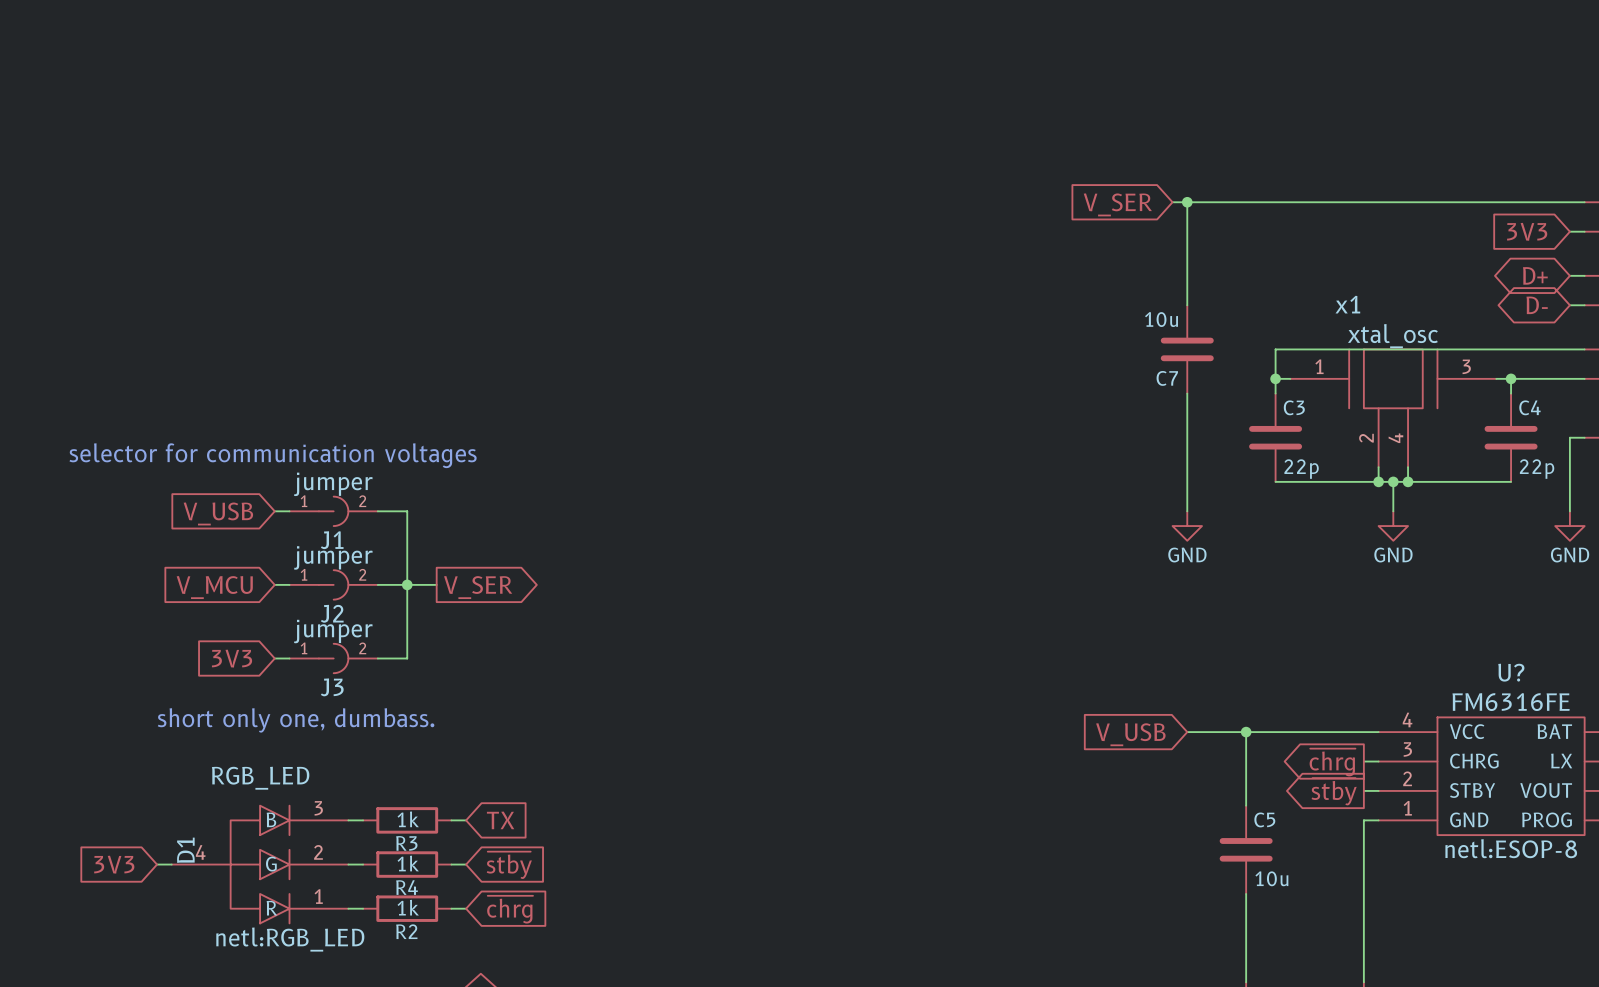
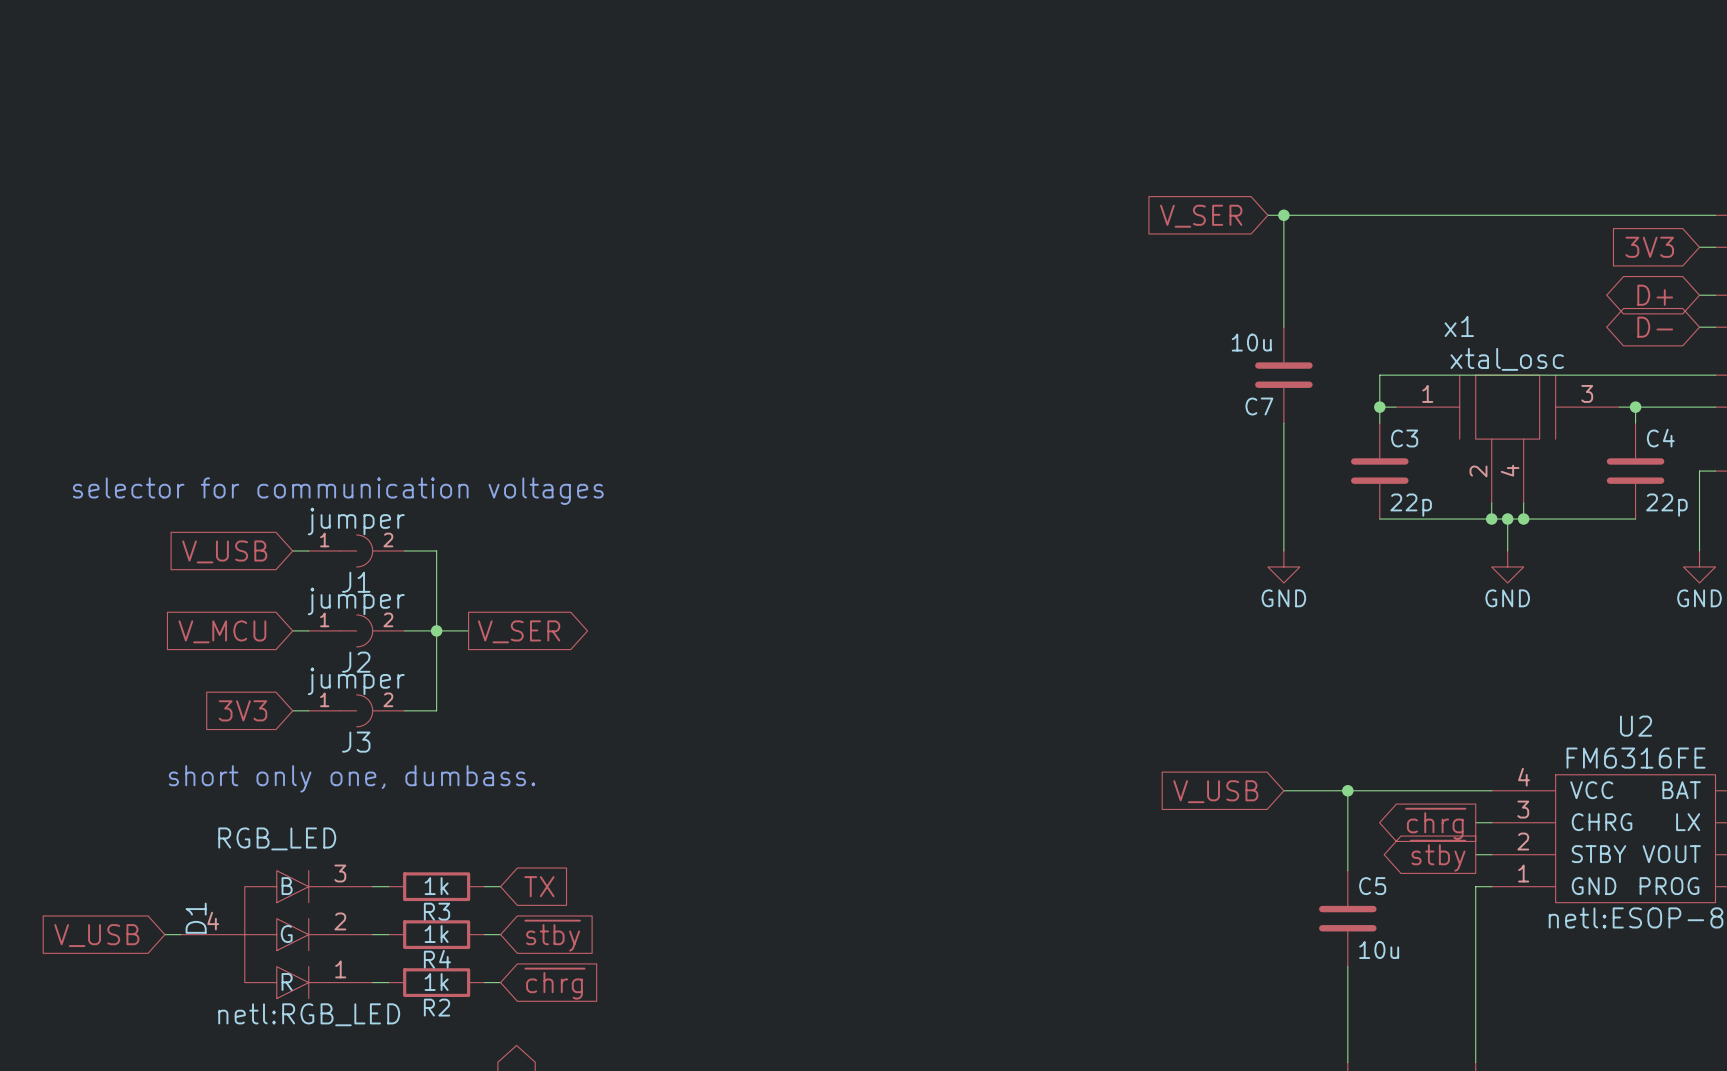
U? name: U? (1511, 672) -> U2 (1636, 726)
global label: 3V3 (114, 864) -> V_USB (96, 935)

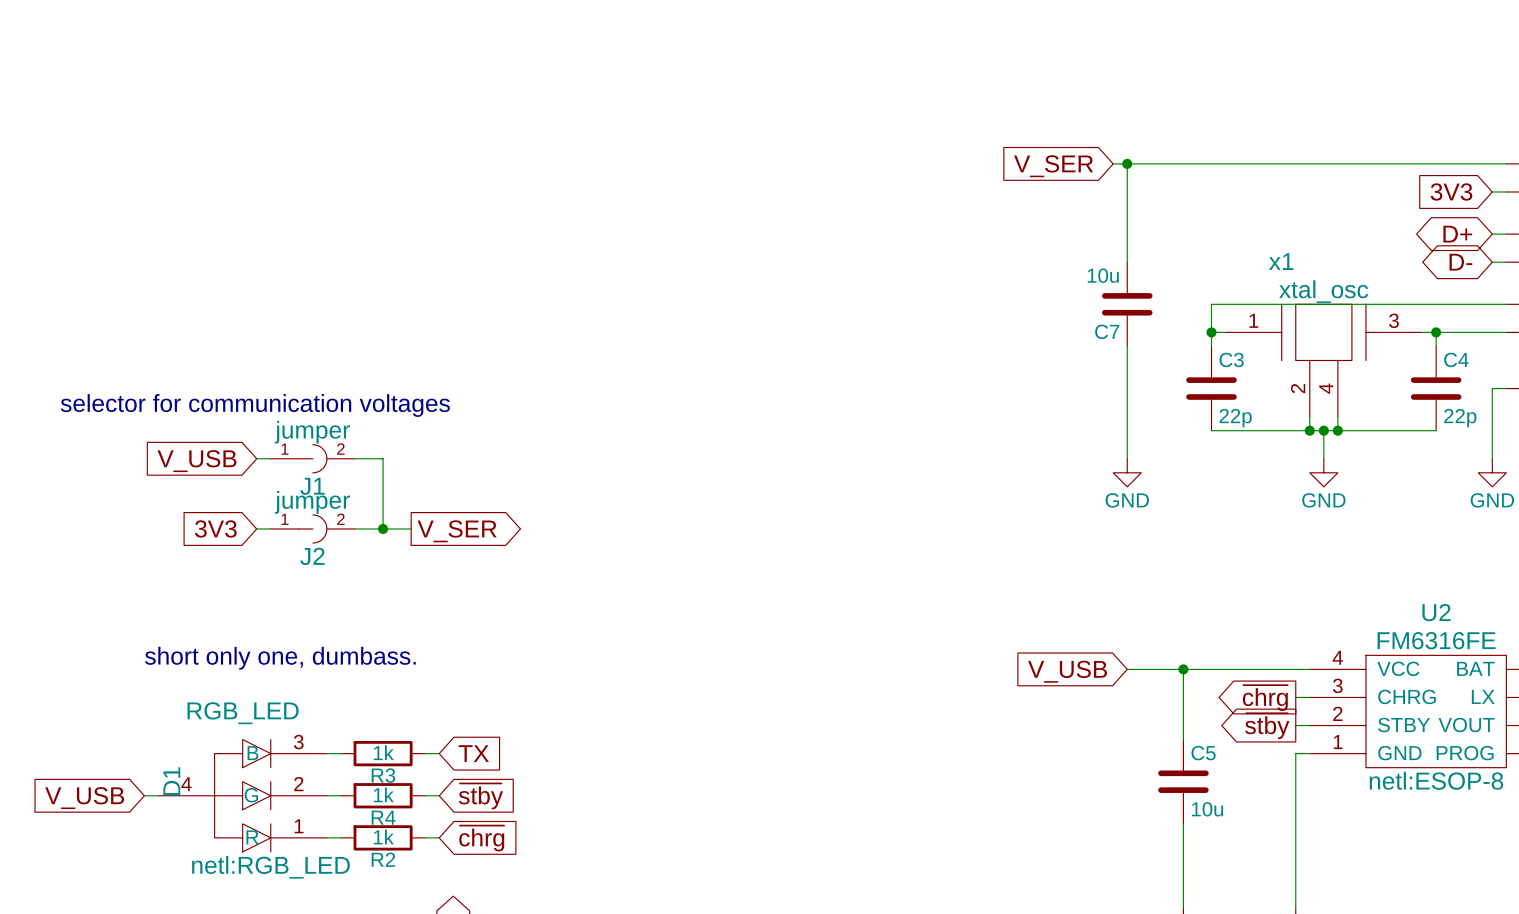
wire: (436, 630) (436, 710) (404, 710) -> none
global label: V_MCU (222, 631) -> 3V3 (215, 528)
global label: 3V3 (242, 710) -> none
wire: (292, 710) (308, 710) -> none
J3: jumper (356, 710) -> none

